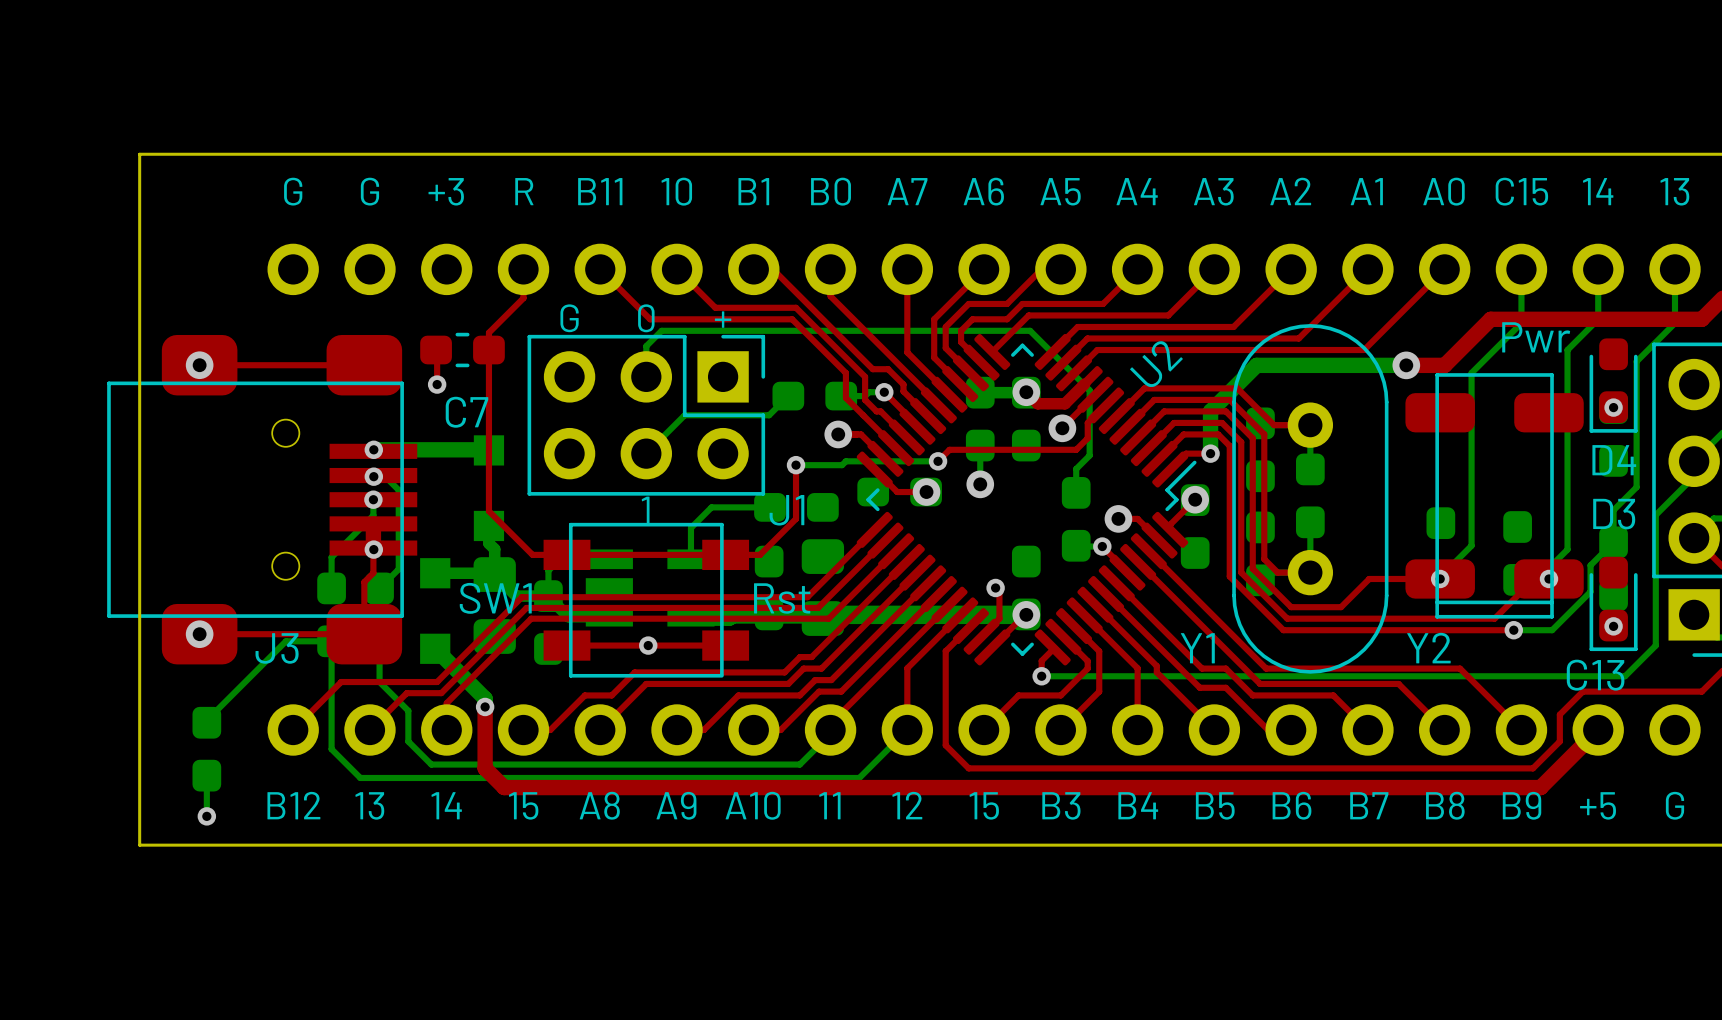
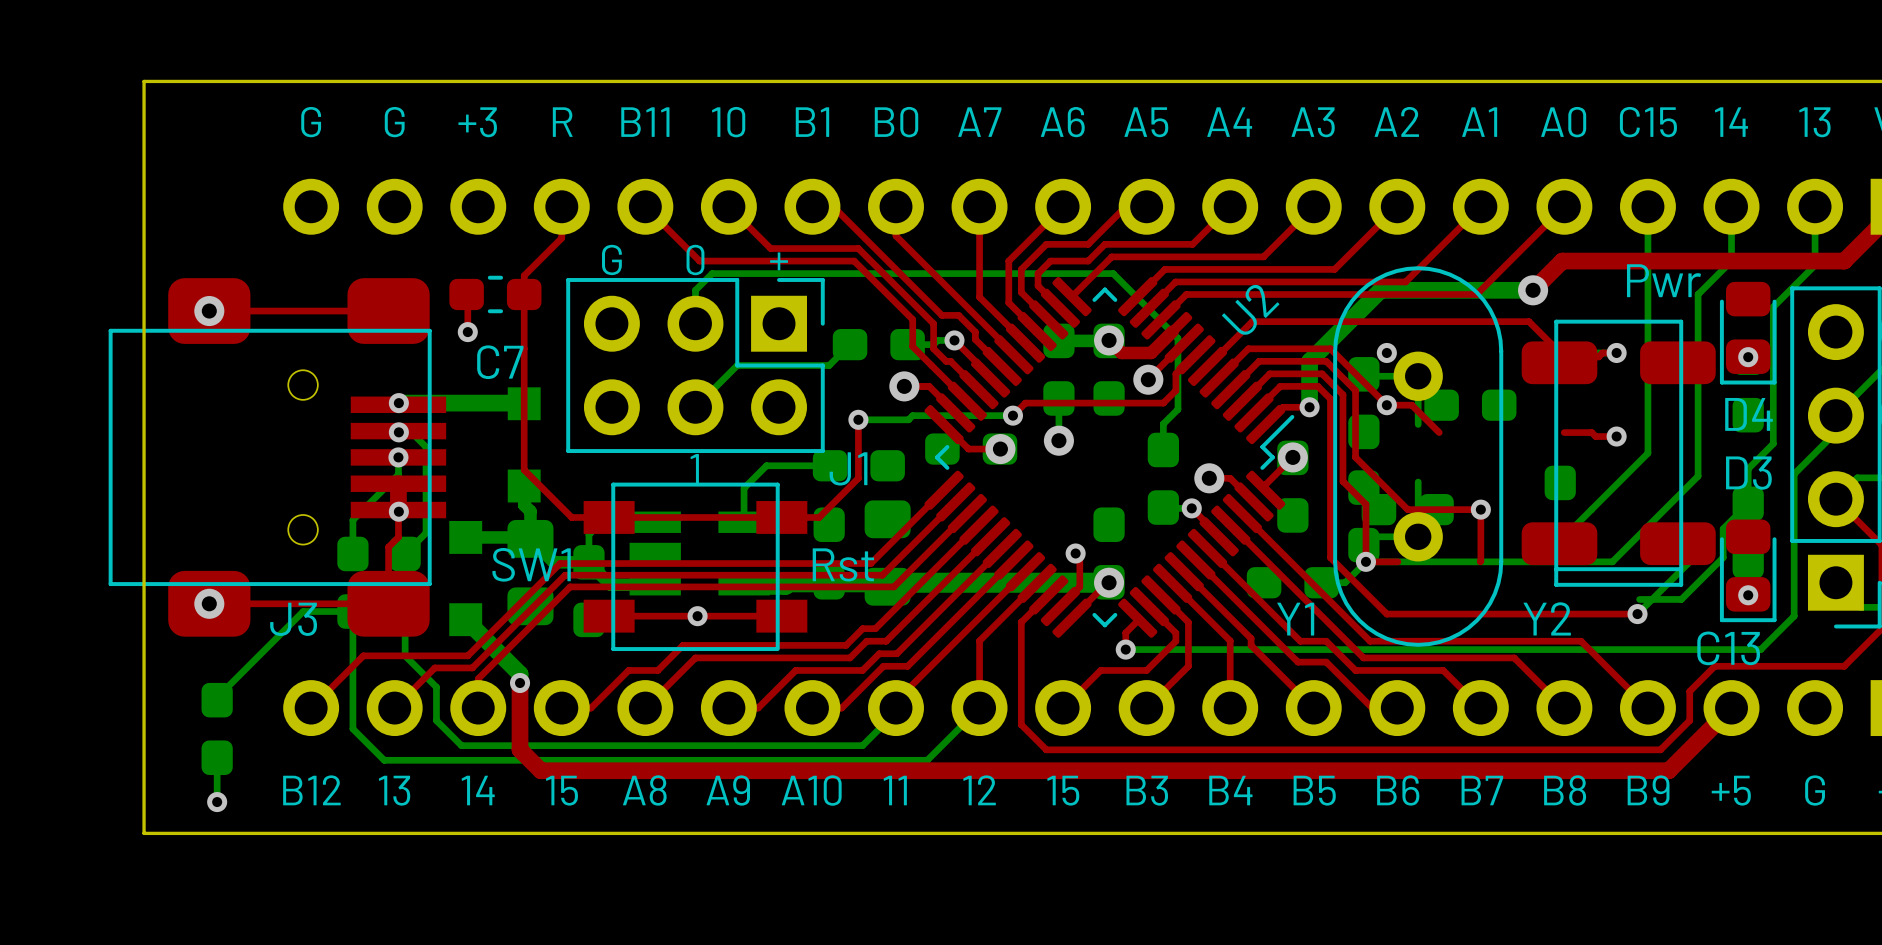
top track: (1490, 319) (1444, 365) (1406, 365) -> (1614, 261) (1562, 261) (1533, 290)
bottom track: (1521, 323) (1471, 373) (1471, 545) -> (1647, 265) (1647, 453) (1593, 507)
D4 footprint: [1589, 338, 1638, 433] -> [1719, 281, 1777, 385]
bottom track: (1256, 365) (1406, 365) -> (1359, 311) (1380, 290) (1533, 290)
via position: (1406, 365) -> (1533, 290)
top track: (1144, 388) (1237, 388) (1274, 425) (1310, 425) -> (1237, 336) (1252, 321) (1528, 321) (1564, 356) (1598, 356) (1602, 352) (1616, 352)
via: none -> (1386, 352)
via: none -> (1616, 352)
top track: (1264, 434) (1264, 559) (1277, 572) (1310, 572) -> (1368, 386) (1386, 405) (1411, 405) (1439, 432)
via: none -> (1386, 405)
part: none -> (1470, 405)
top track: none -> (1564, 432) (1591, 432) (1595, 436) (1616, 436)
via: none -> (1616, 436)
part: (1310, 495) -> none
top track: (1252, 499) (1252, 568) (1291, 607) (1341, 607) (1369, 578) (1440, 578) -> (1355, 457) (1407, 509) (1480, 509) (1480, 561)
bottom track: (1567, 516) (1567, 549) (1548, 568) (1548, 578) -> (1698, 476) (1612, 561) (1365, 561) (1345, 582) (1321, 582)
top track: (1241, 521) (1241, 572) (1287, 618) (1494, 618) (1534, 578) (1548, 578) -> (1343, 481) (1365, 504) (1365, 561) (1397, 561)
part: none -> (1407, 509)
via: none -> (1480, 509)
part: (1517, 553) -> none
D3 footprint: [1589, 556, 1638, 652] -> [1719, 519, 1777, 623]
top track: (1229, 576) (1283, 630) (1513, 630) -> (1330, 540) (1330, 557) (1386, 614) (1637, 614)
via: (1440, 578) -> none
via: (1548, 578) -> none
via: none -> (1365, 561)
bottom track: none -> (1689, 561) (1637, 614)
part: none -> (1292, 582)
via position: (1513, 630) -> (1637, 614)

